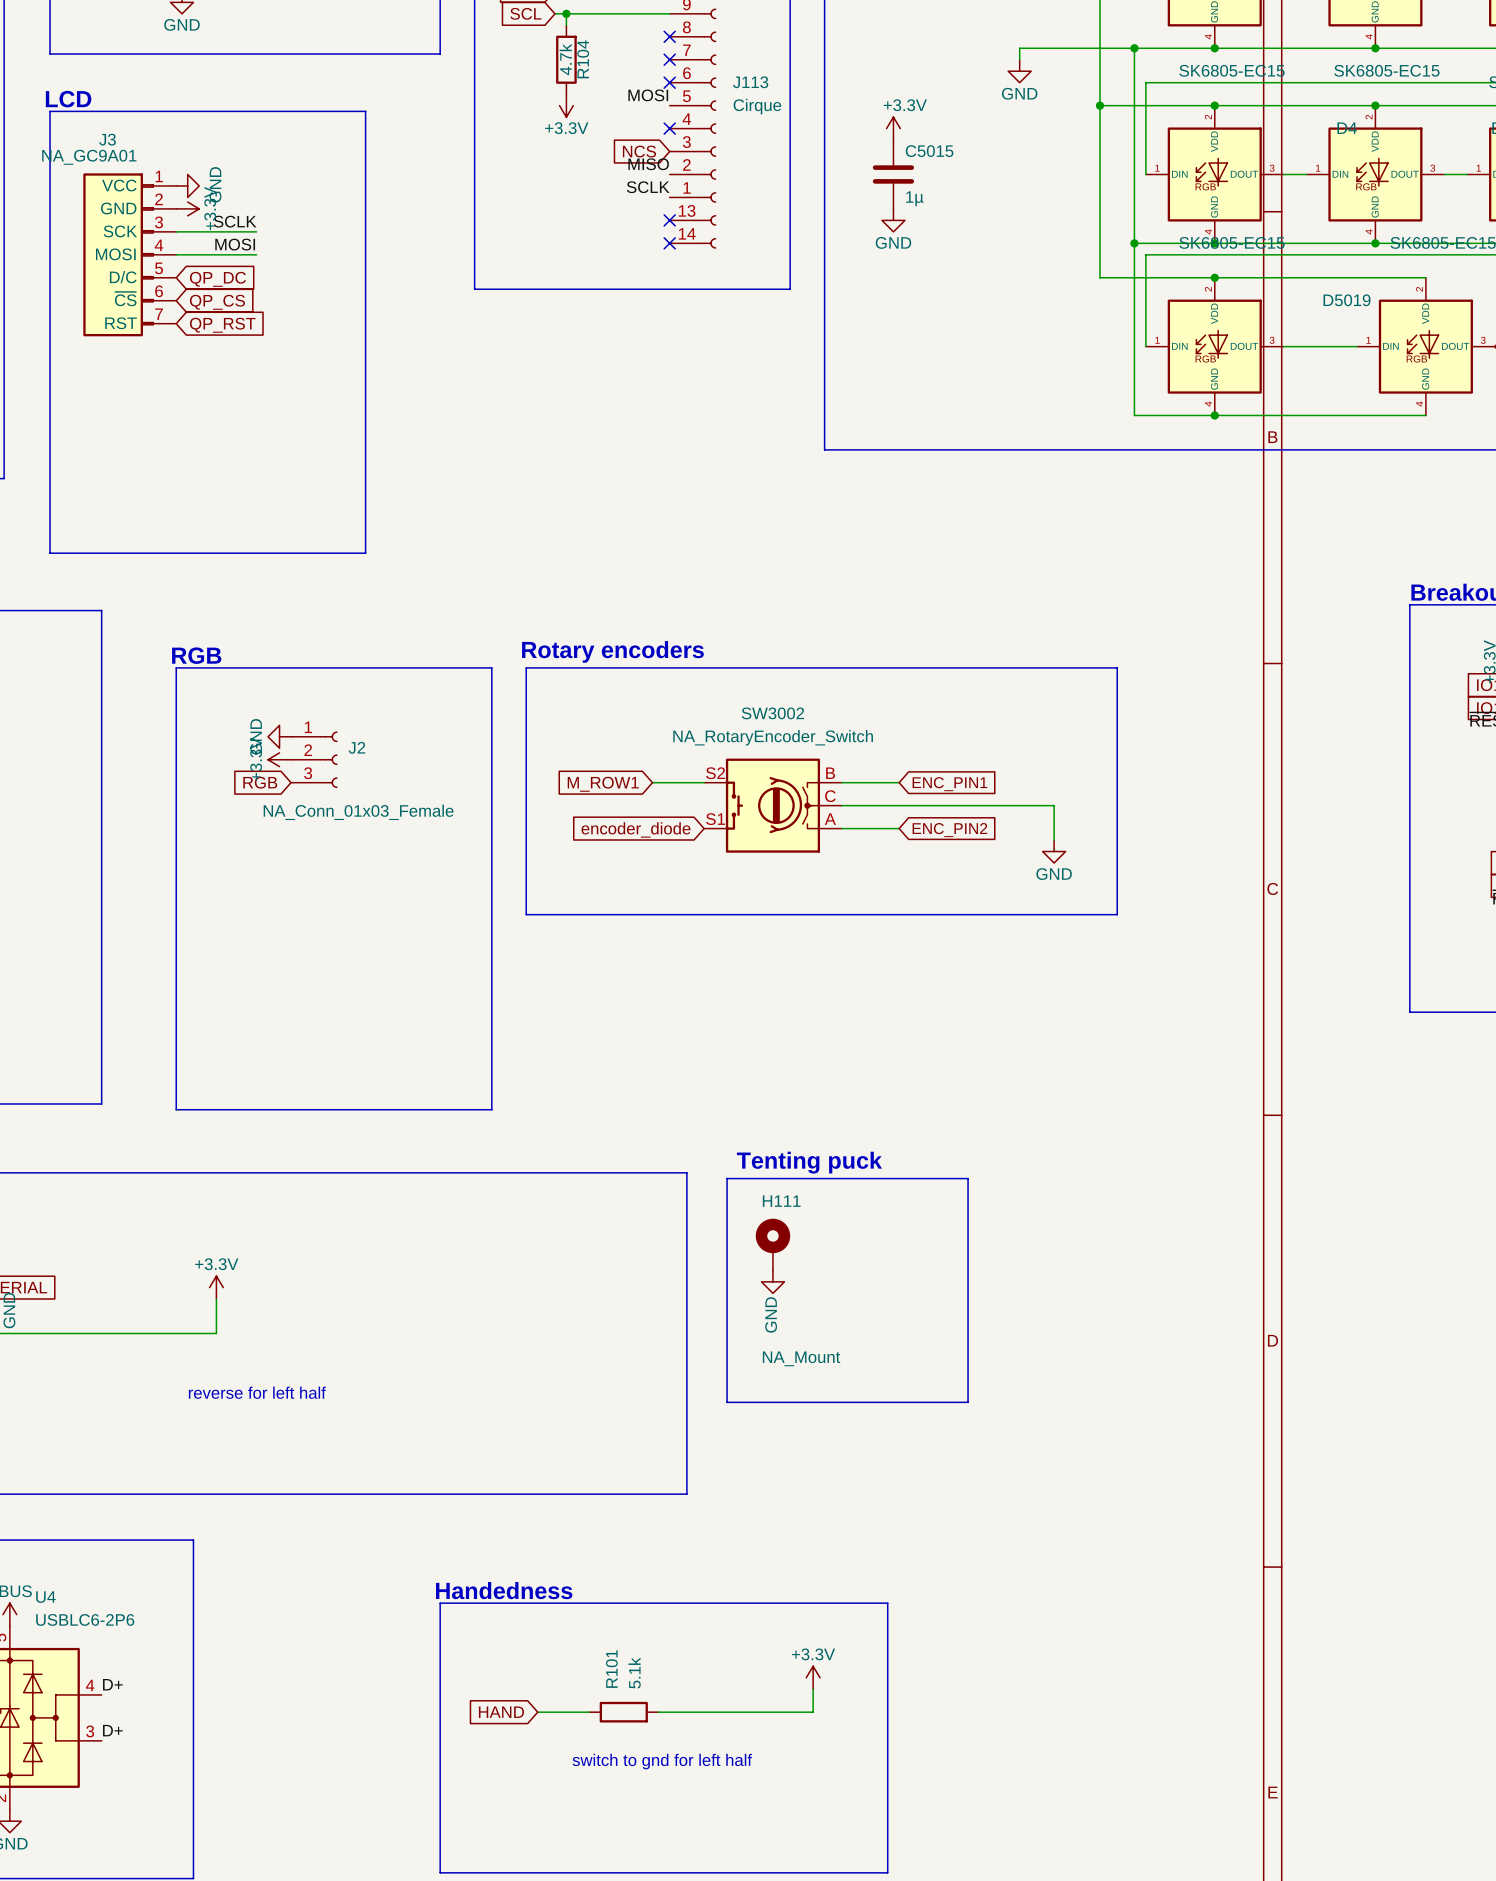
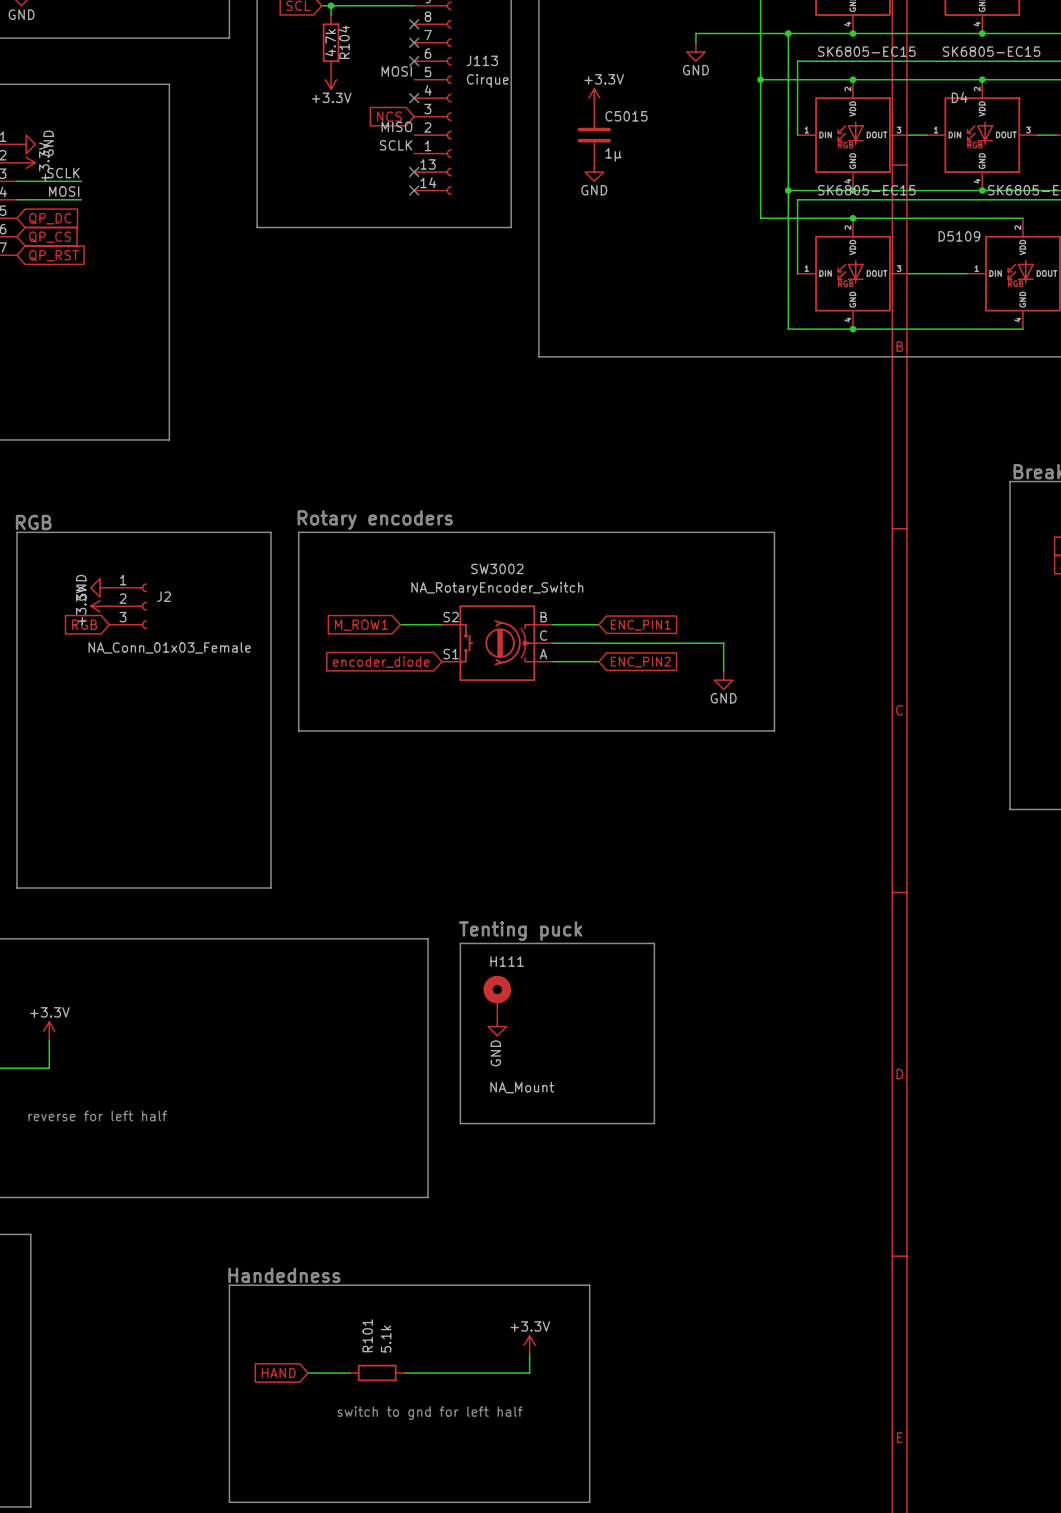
D5019 name: D5019 (1347, 300) -> D5109 (959, 236)

